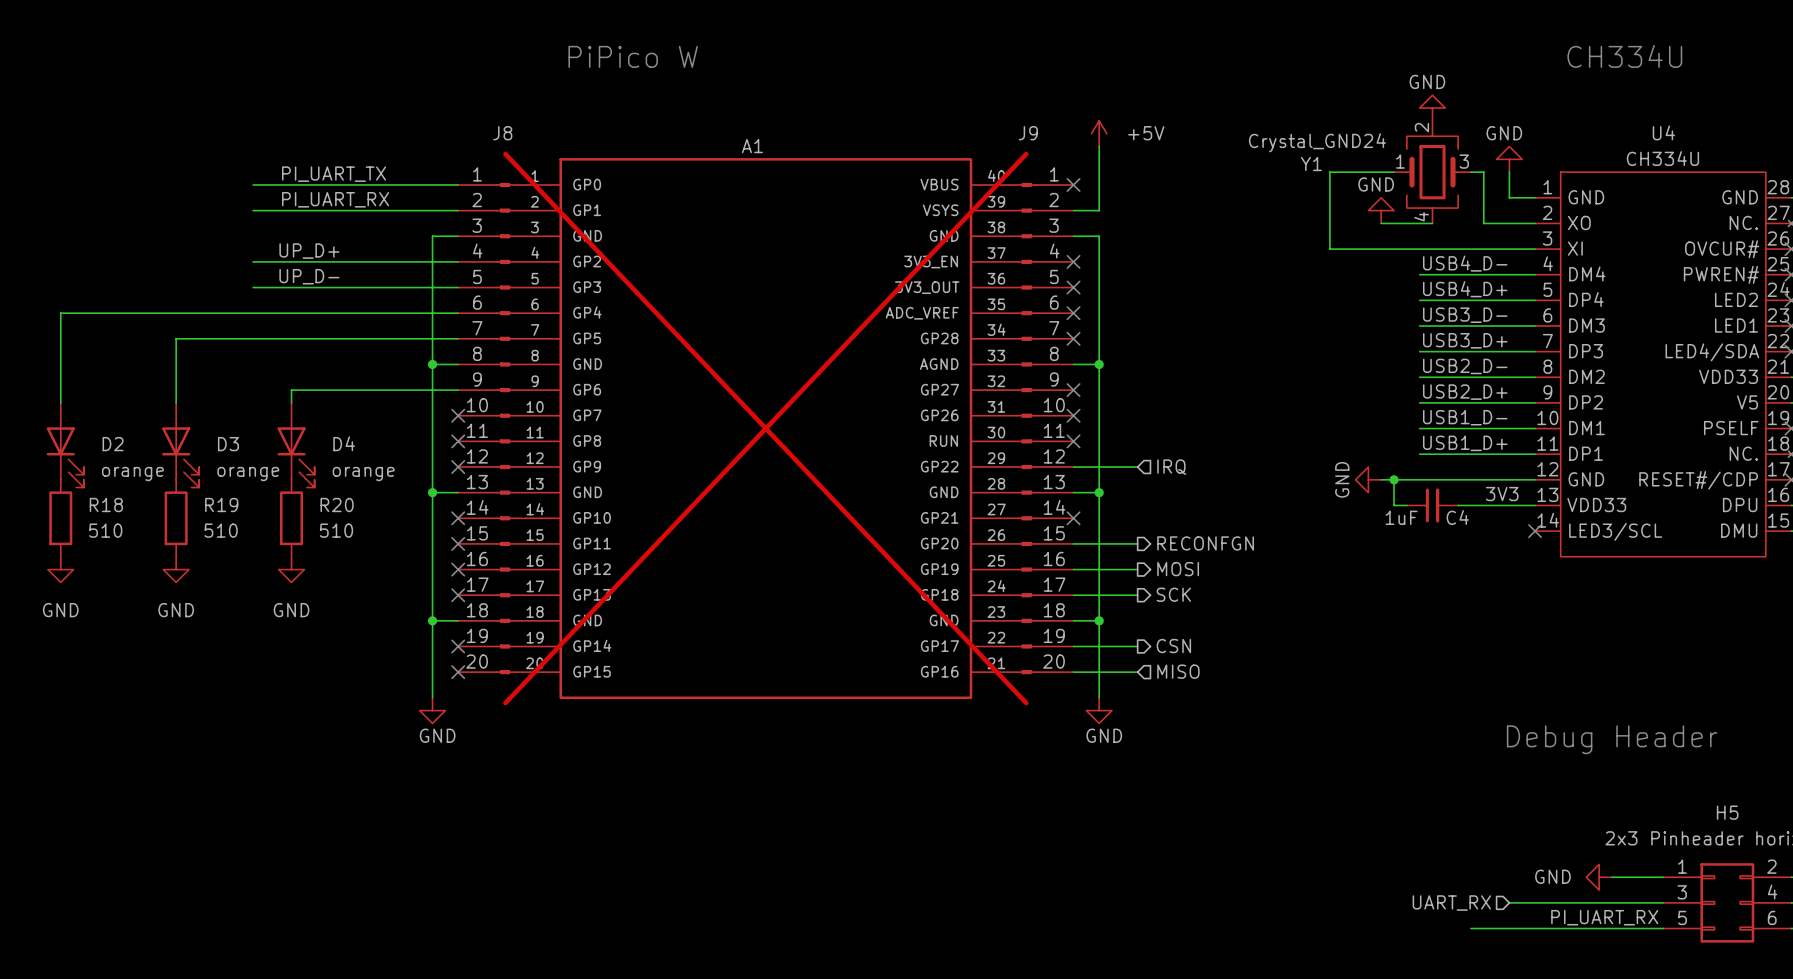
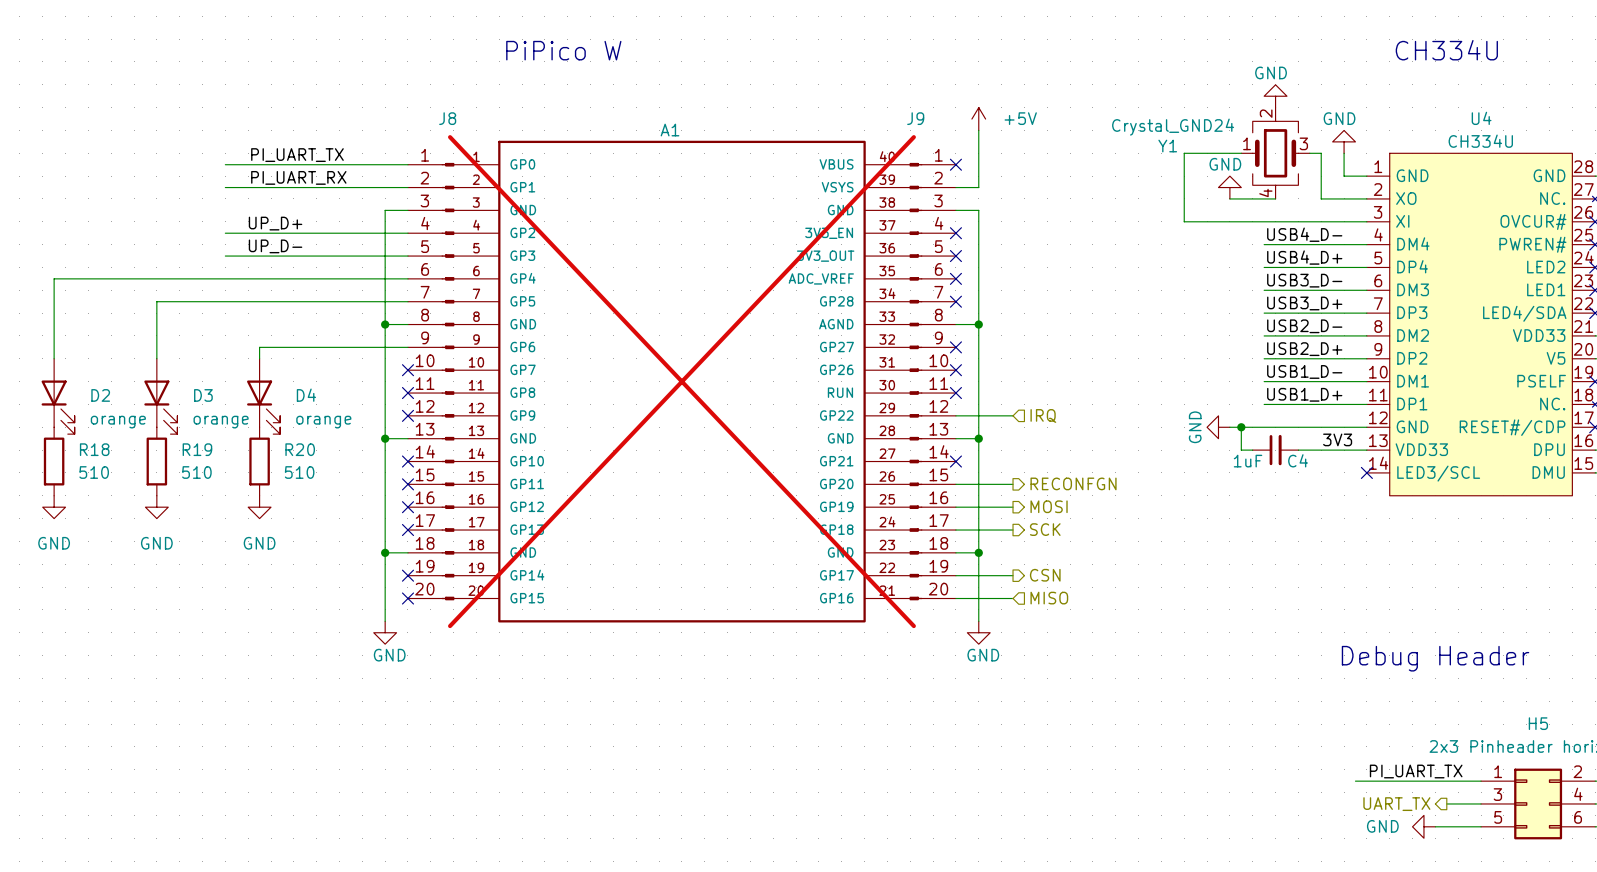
label: none -> PI_UART_TX (1416, 771)
wire: none -> (1355, 781) (1435, 781)
power symbol position: GND (1599, 877) -> GND (1423, 826)
wire: (1509, 902) (1624, 902) -> none
hierarchical label: UART_RX (1451, 903) -> none
hierarchical label: none -> UART_TX (1396, 804)
label: PI_UART_RX (1604, 917) -> none
wire: (1470, 928) (1611, 928) -> none

